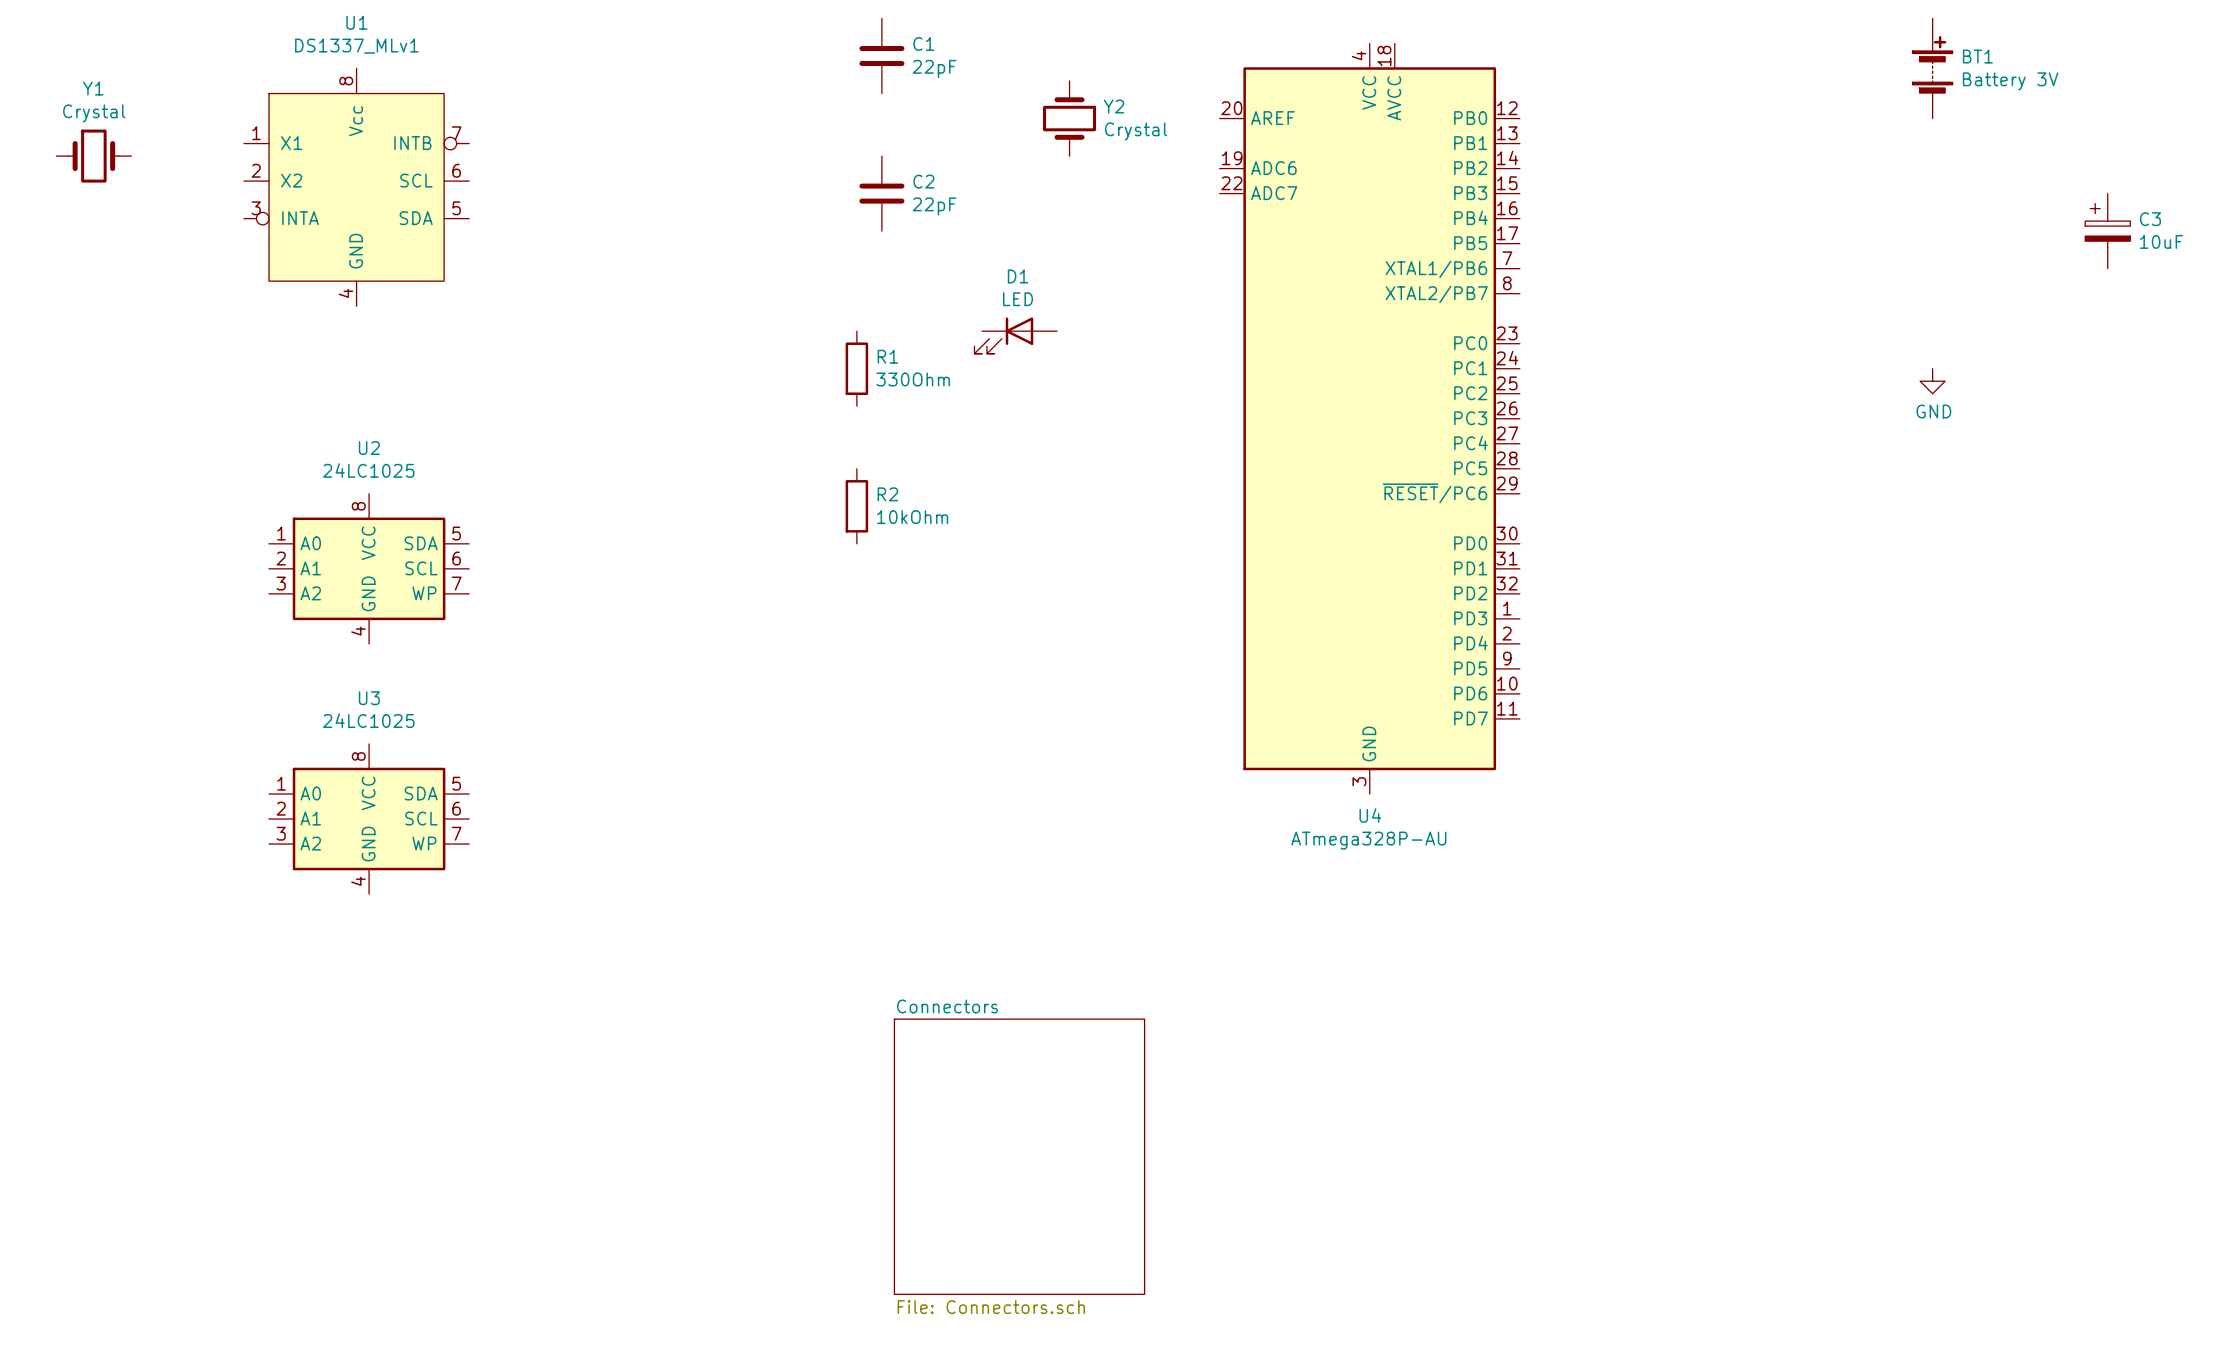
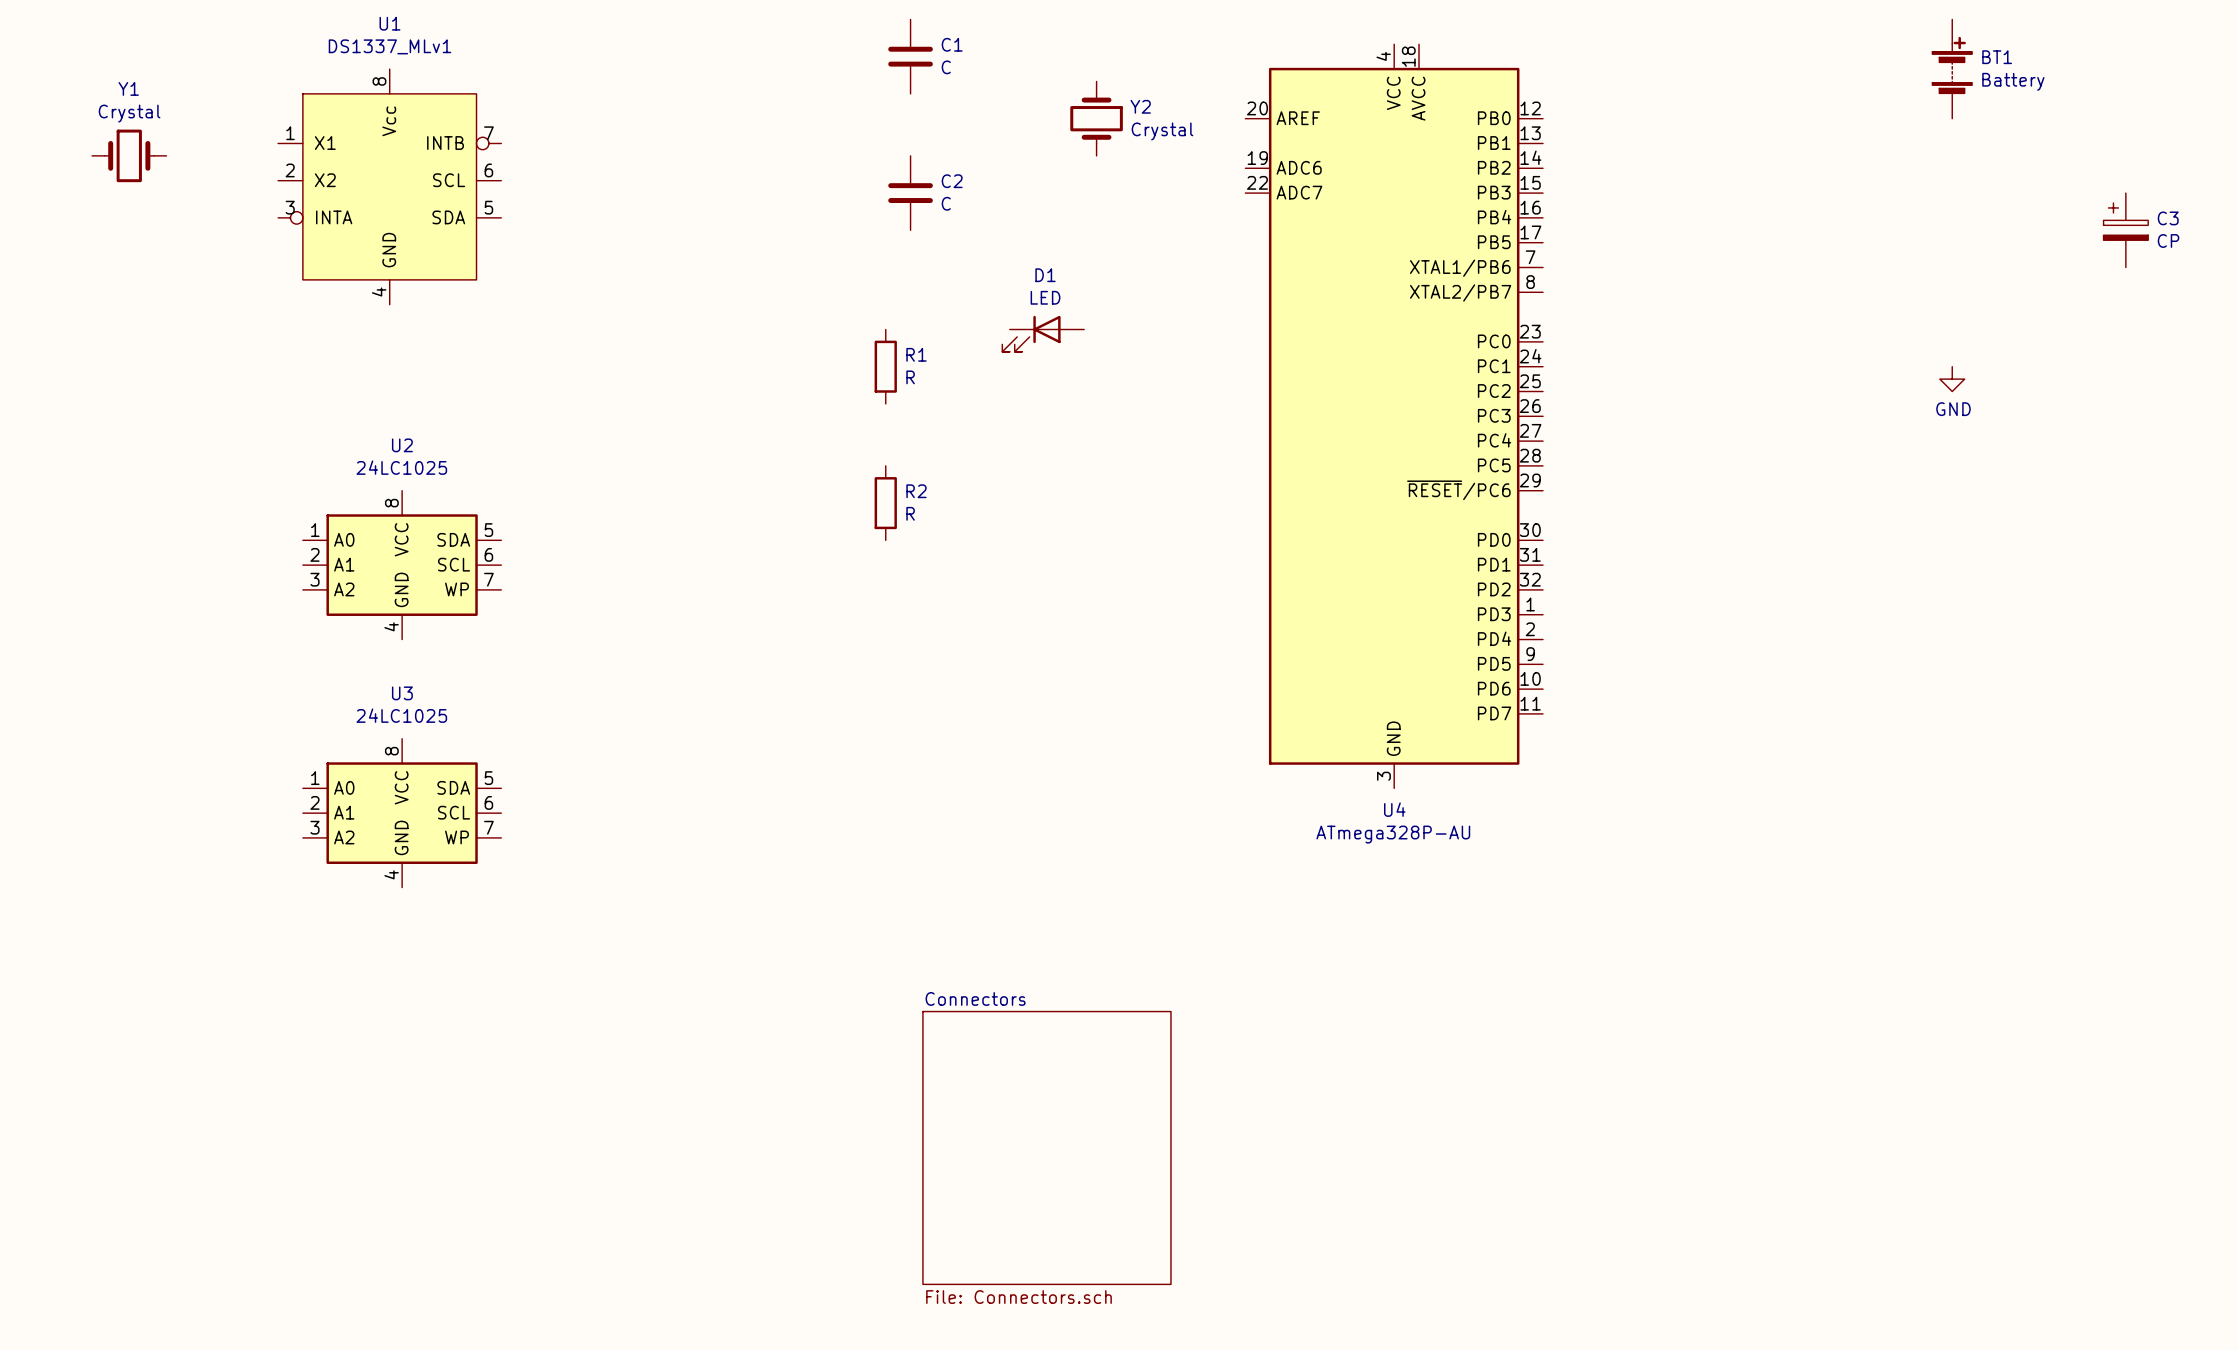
C1 value: 22pF (934, 68) -> C (946, 67)
BT1 value: Battery 3V (2010, 81) -> Battery (2013, 81)
C2 value: 22pF (934, 206) -> C (946, 203)
C3 value: 10uF (2161, 241) -> CP (2168, 240)
R1 value: 330Ohm (913, 379) -> R (910, 377)
R2 value: 10kOhm (912, 517) -> R (910, 513)

